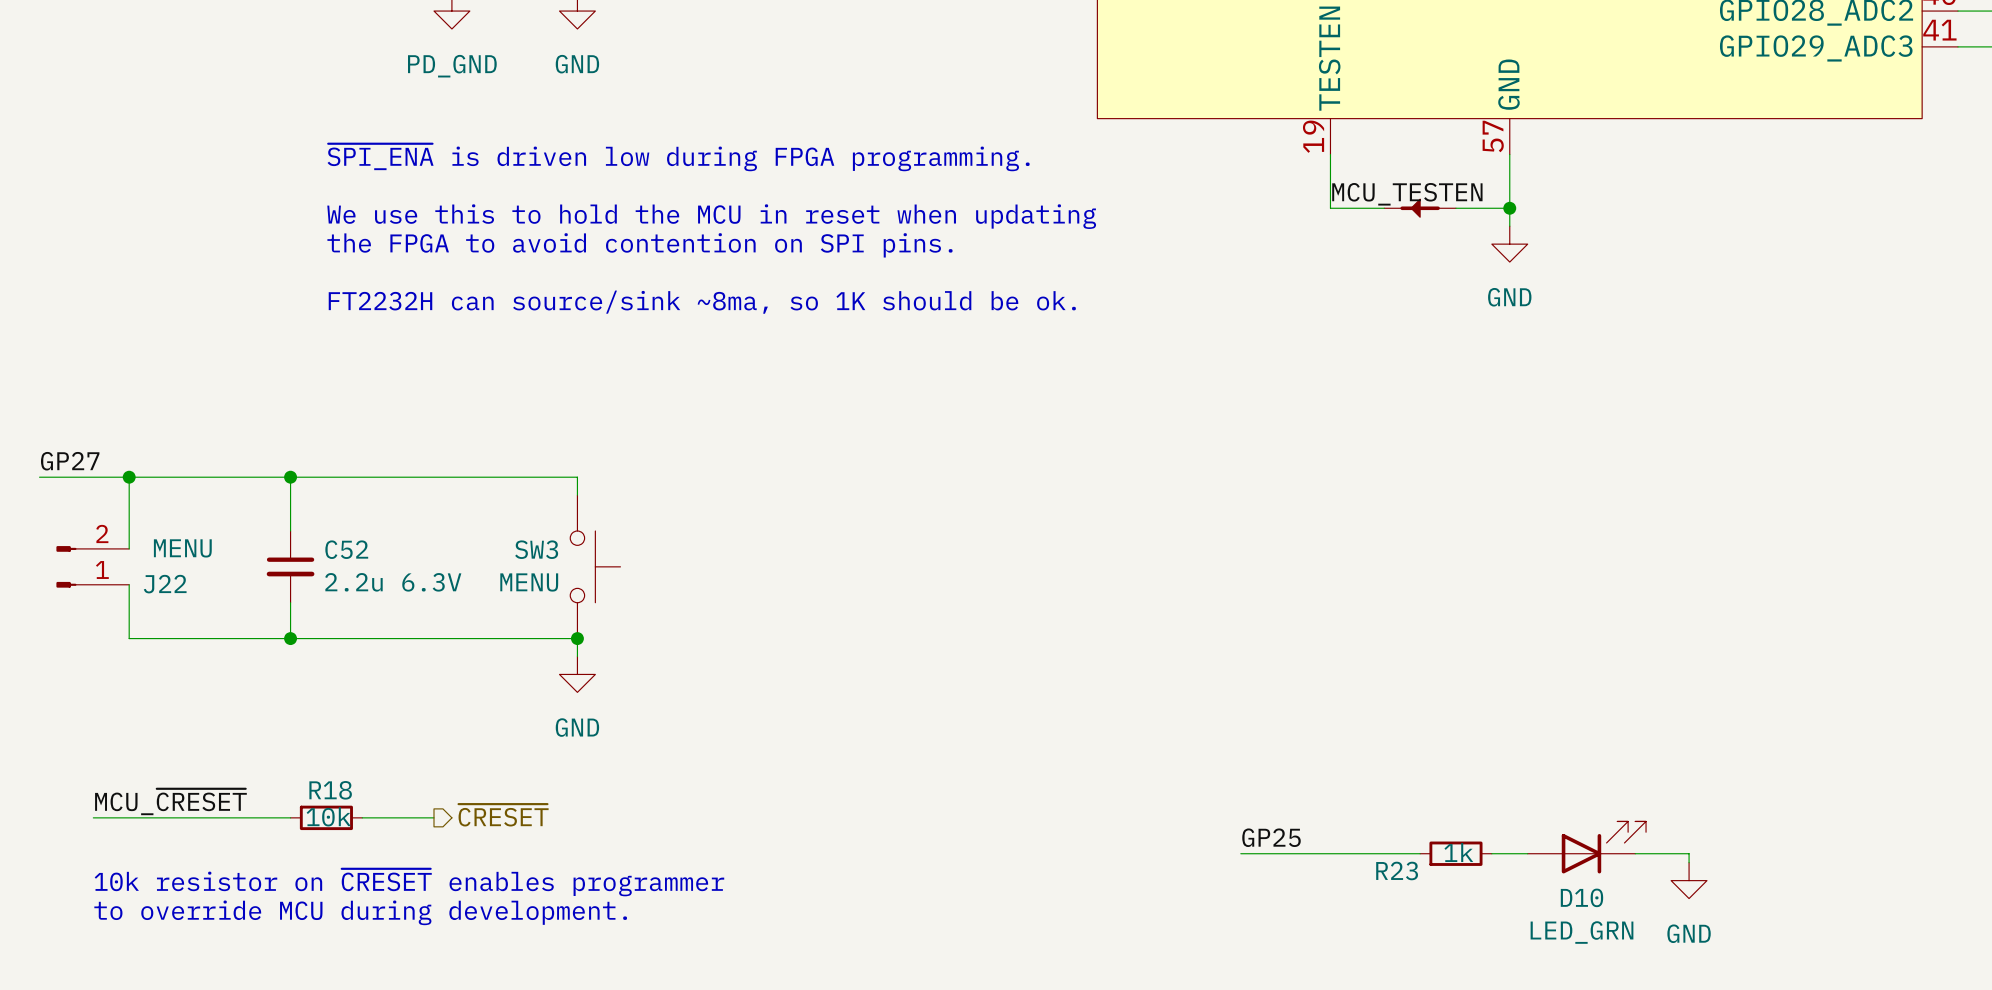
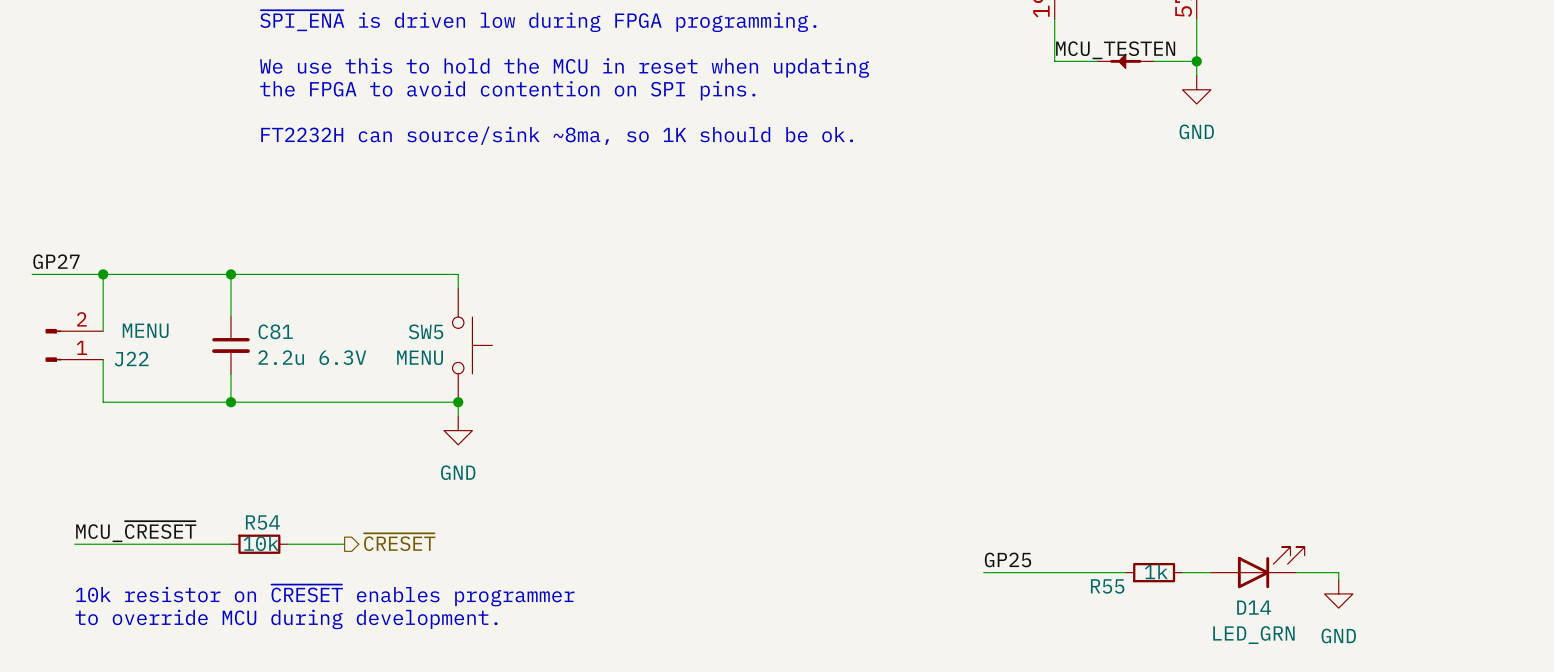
C52 name: C52 (346, 549) -> C81 (275, 331)
SW3 name: SW3 (536, 549) -> SW5 (426, 331)
R18 name: R18 (330, 790) -> R54 (262, 522)
R23 name: R23 (1397, 870) -> R55 (1107, 586)
D10 name: D10 (1581, 897) -> D14 (1254, 607)

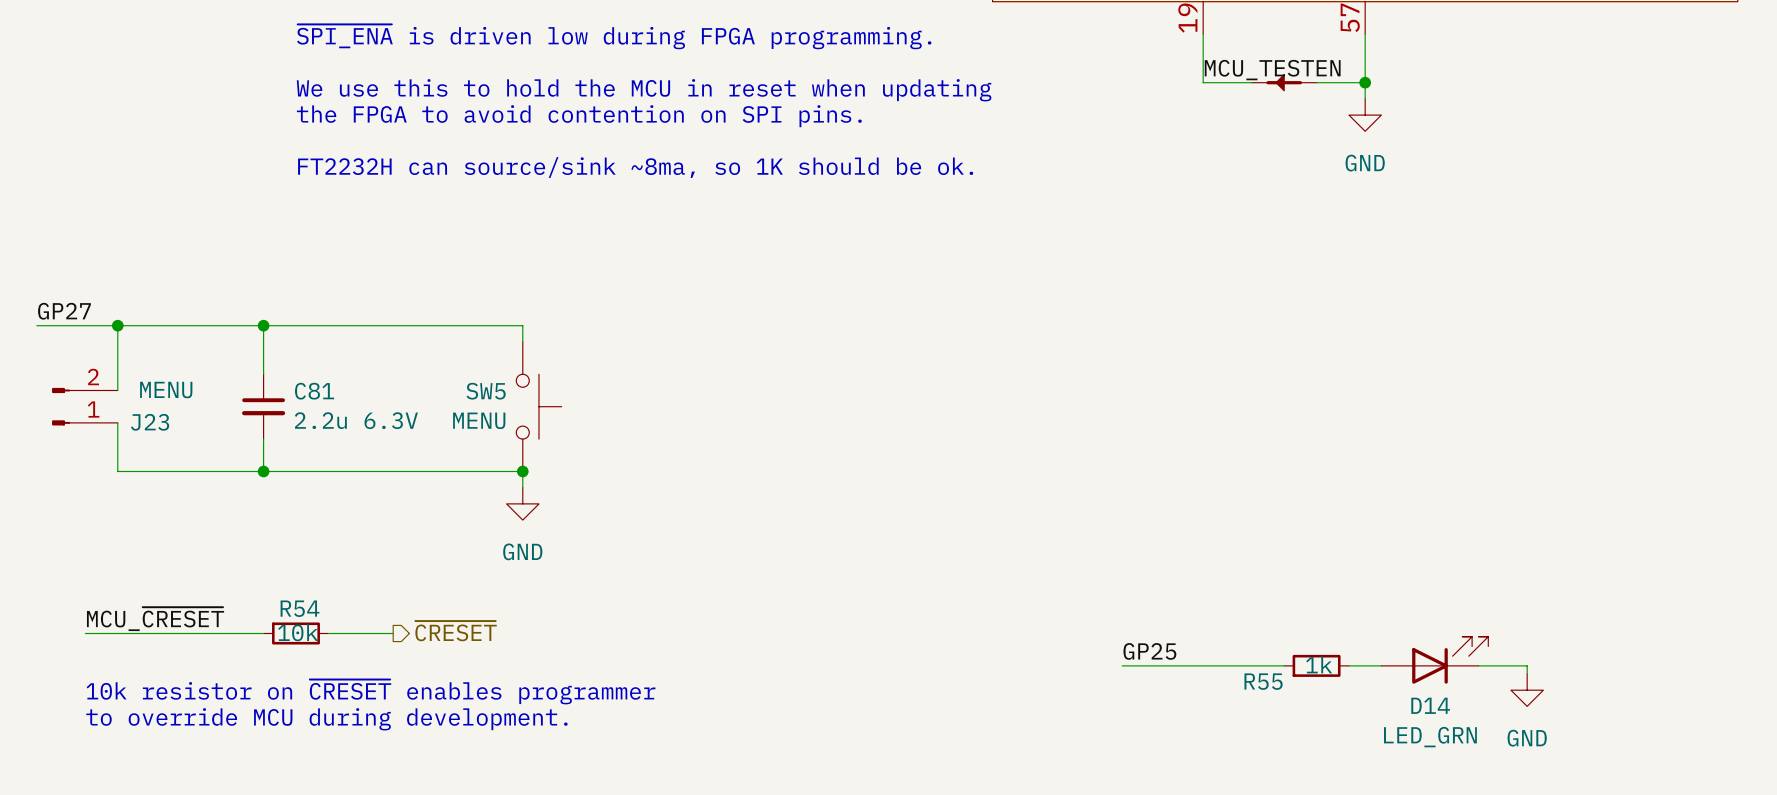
J22 name: J22 (131, 359) -> J23 (150, 422)

